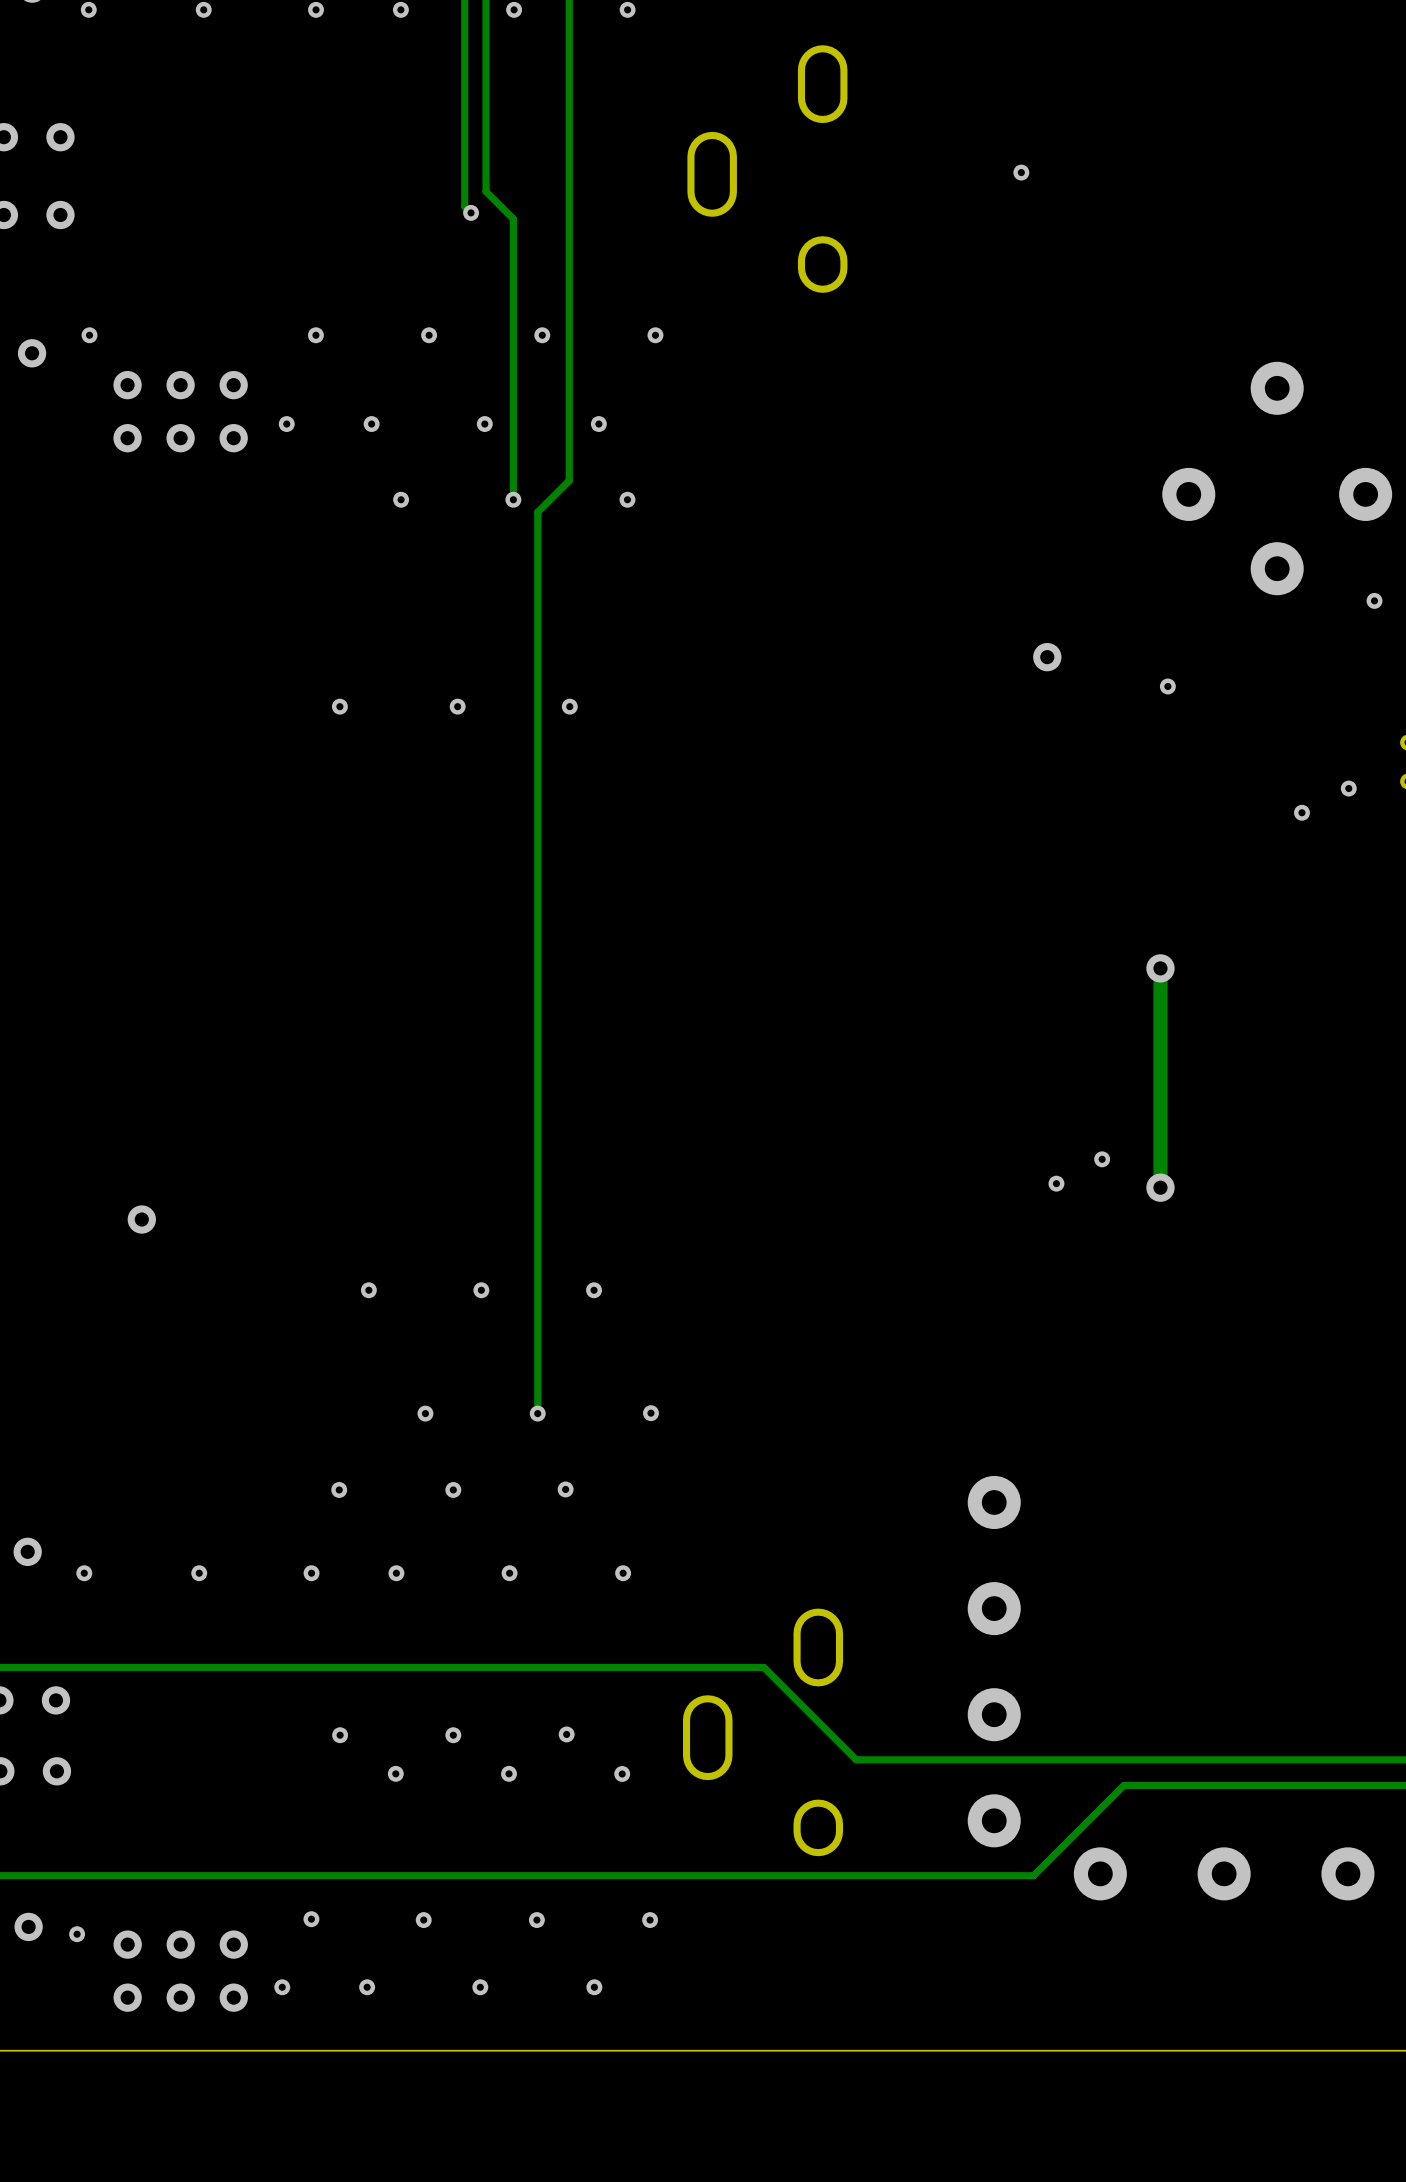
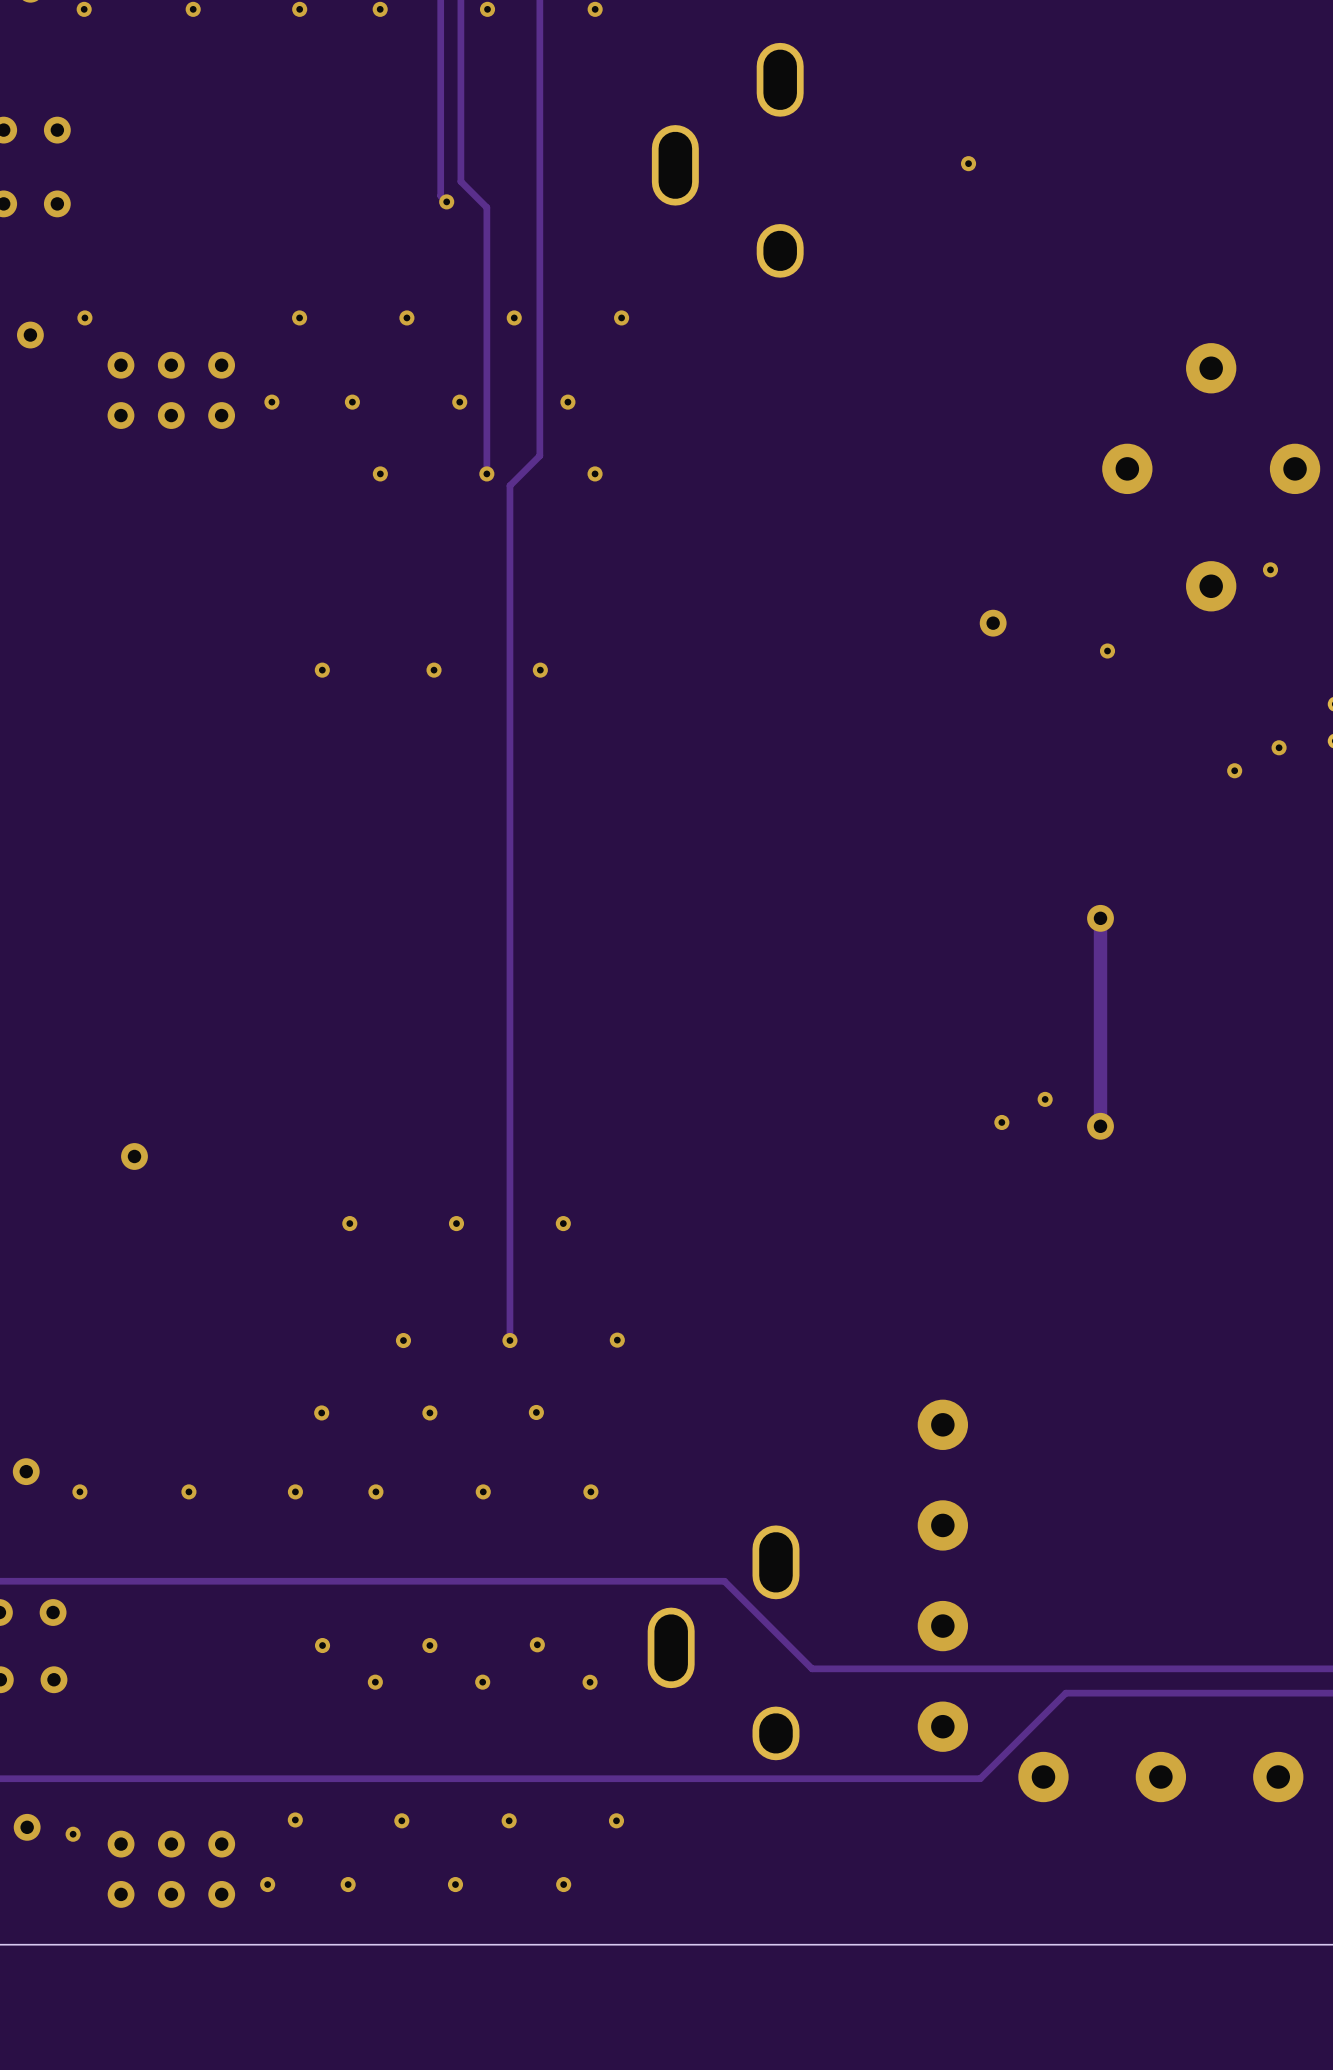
via position: (1277, 568) -> (1211, 586)
via: none -> (1270, 569)
via: (1374, 600) -> none

